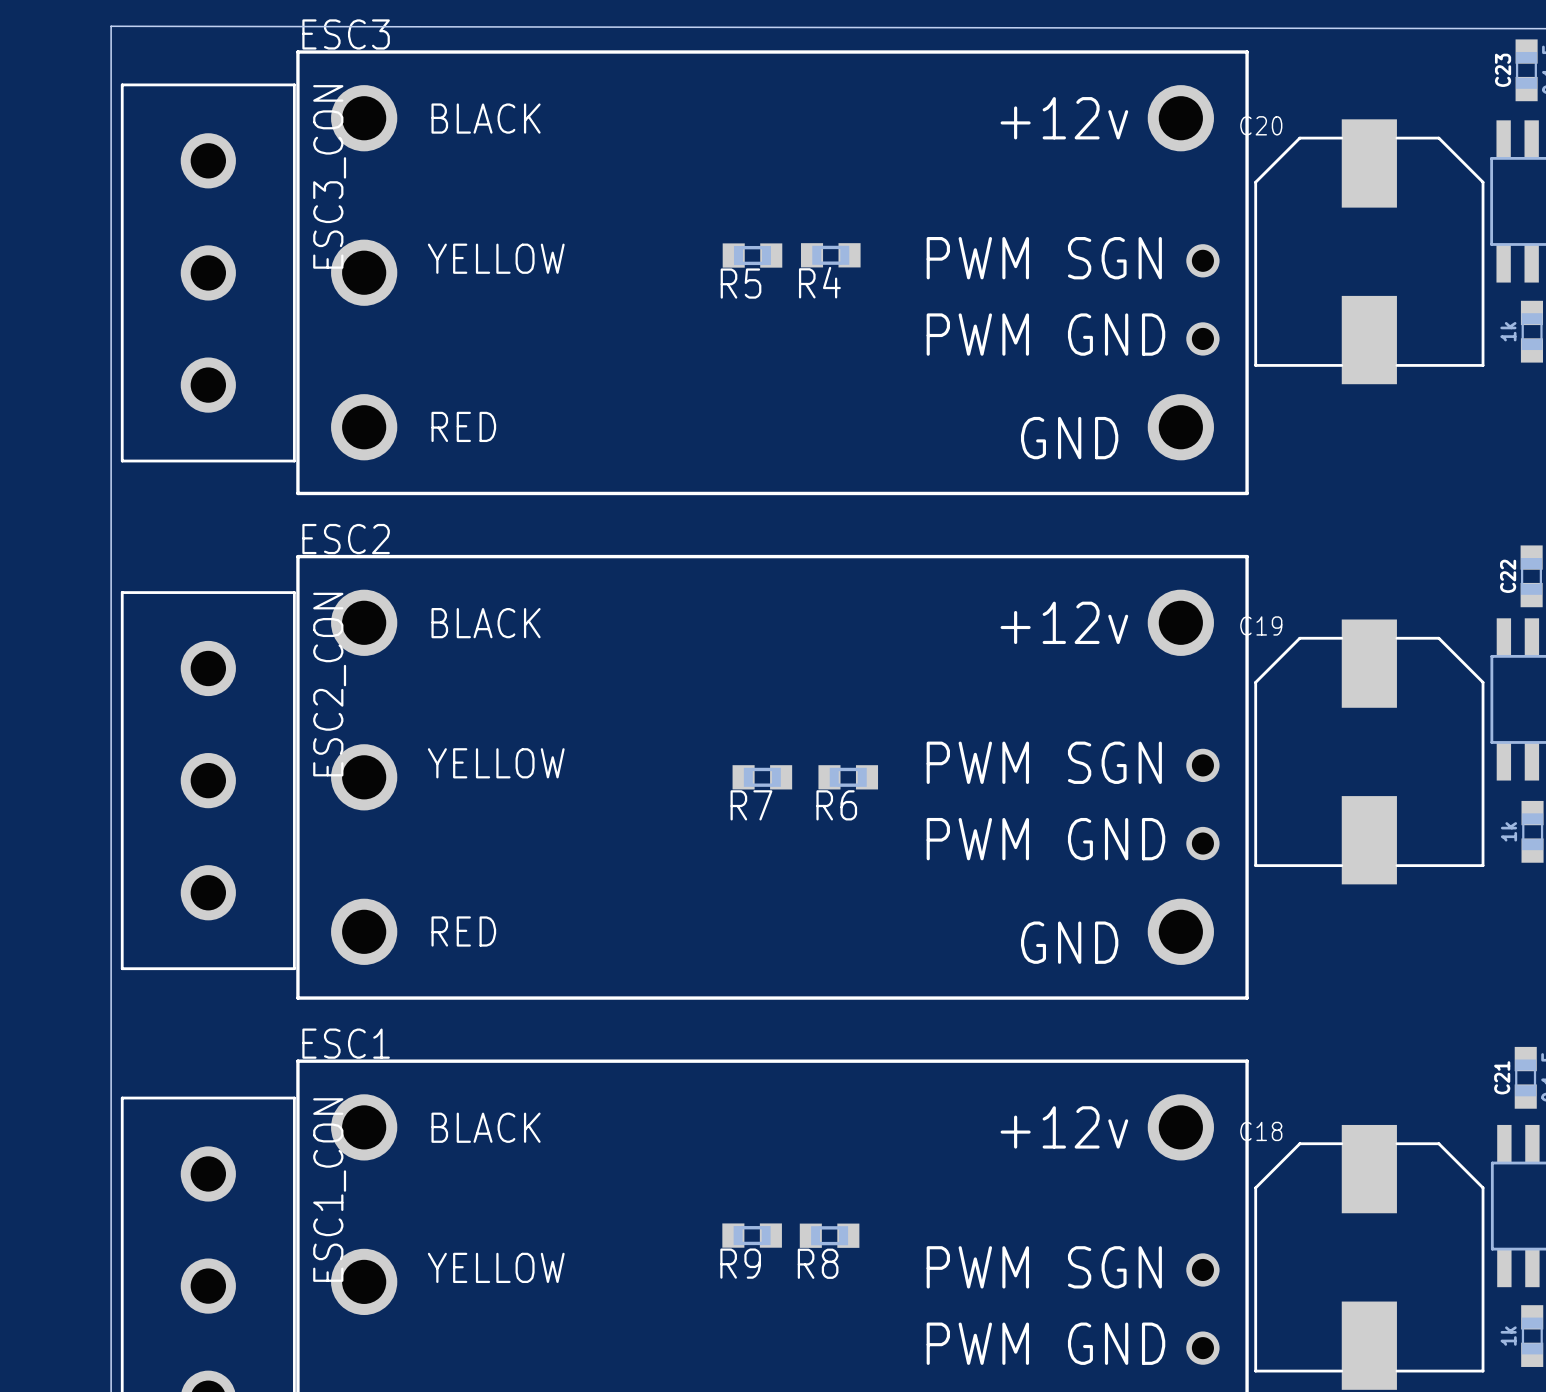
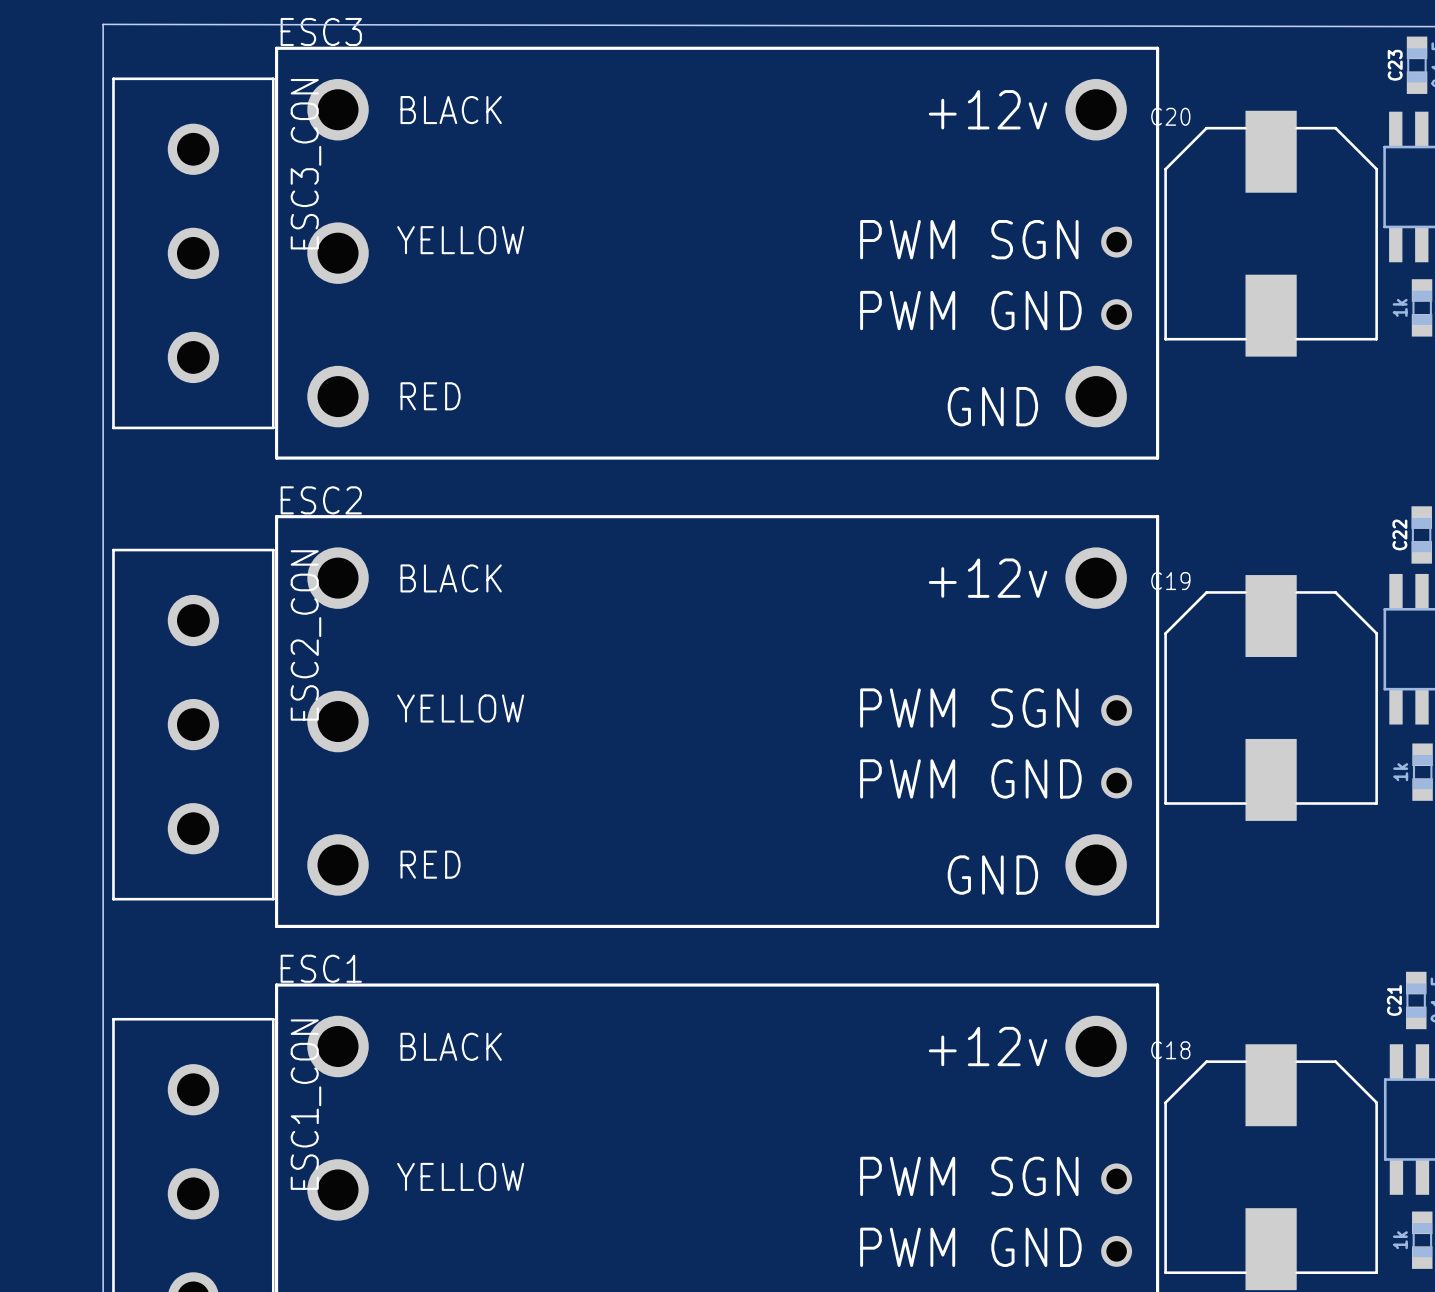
R5: (752, 255) -> none
R4: (830, 255) -> none
R7: (762, 777) -> none
R6: (848, 777) -> none
R9: (752, 1235) -> none
R8: (829, 1235) -> none

